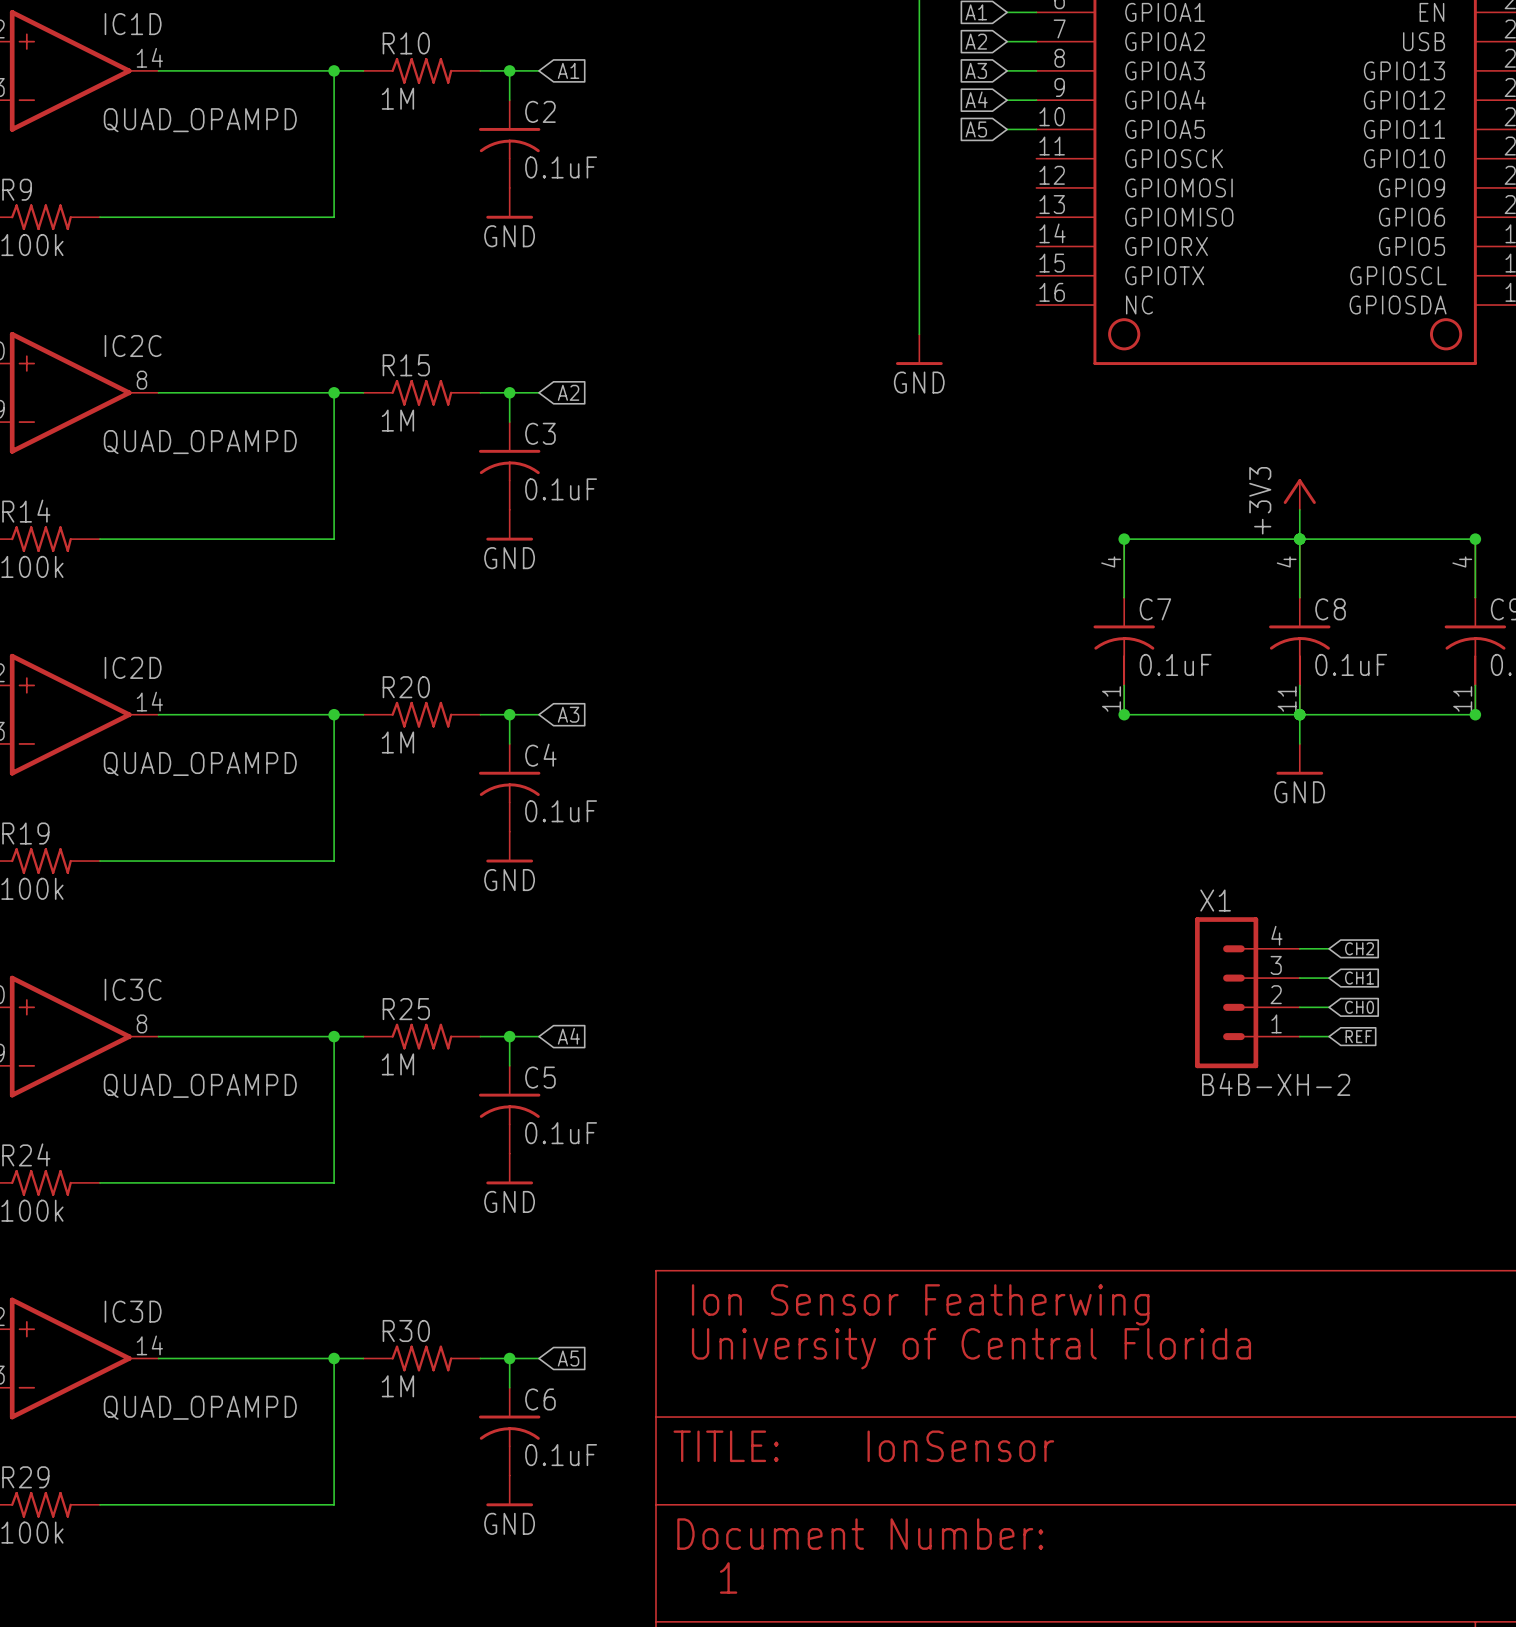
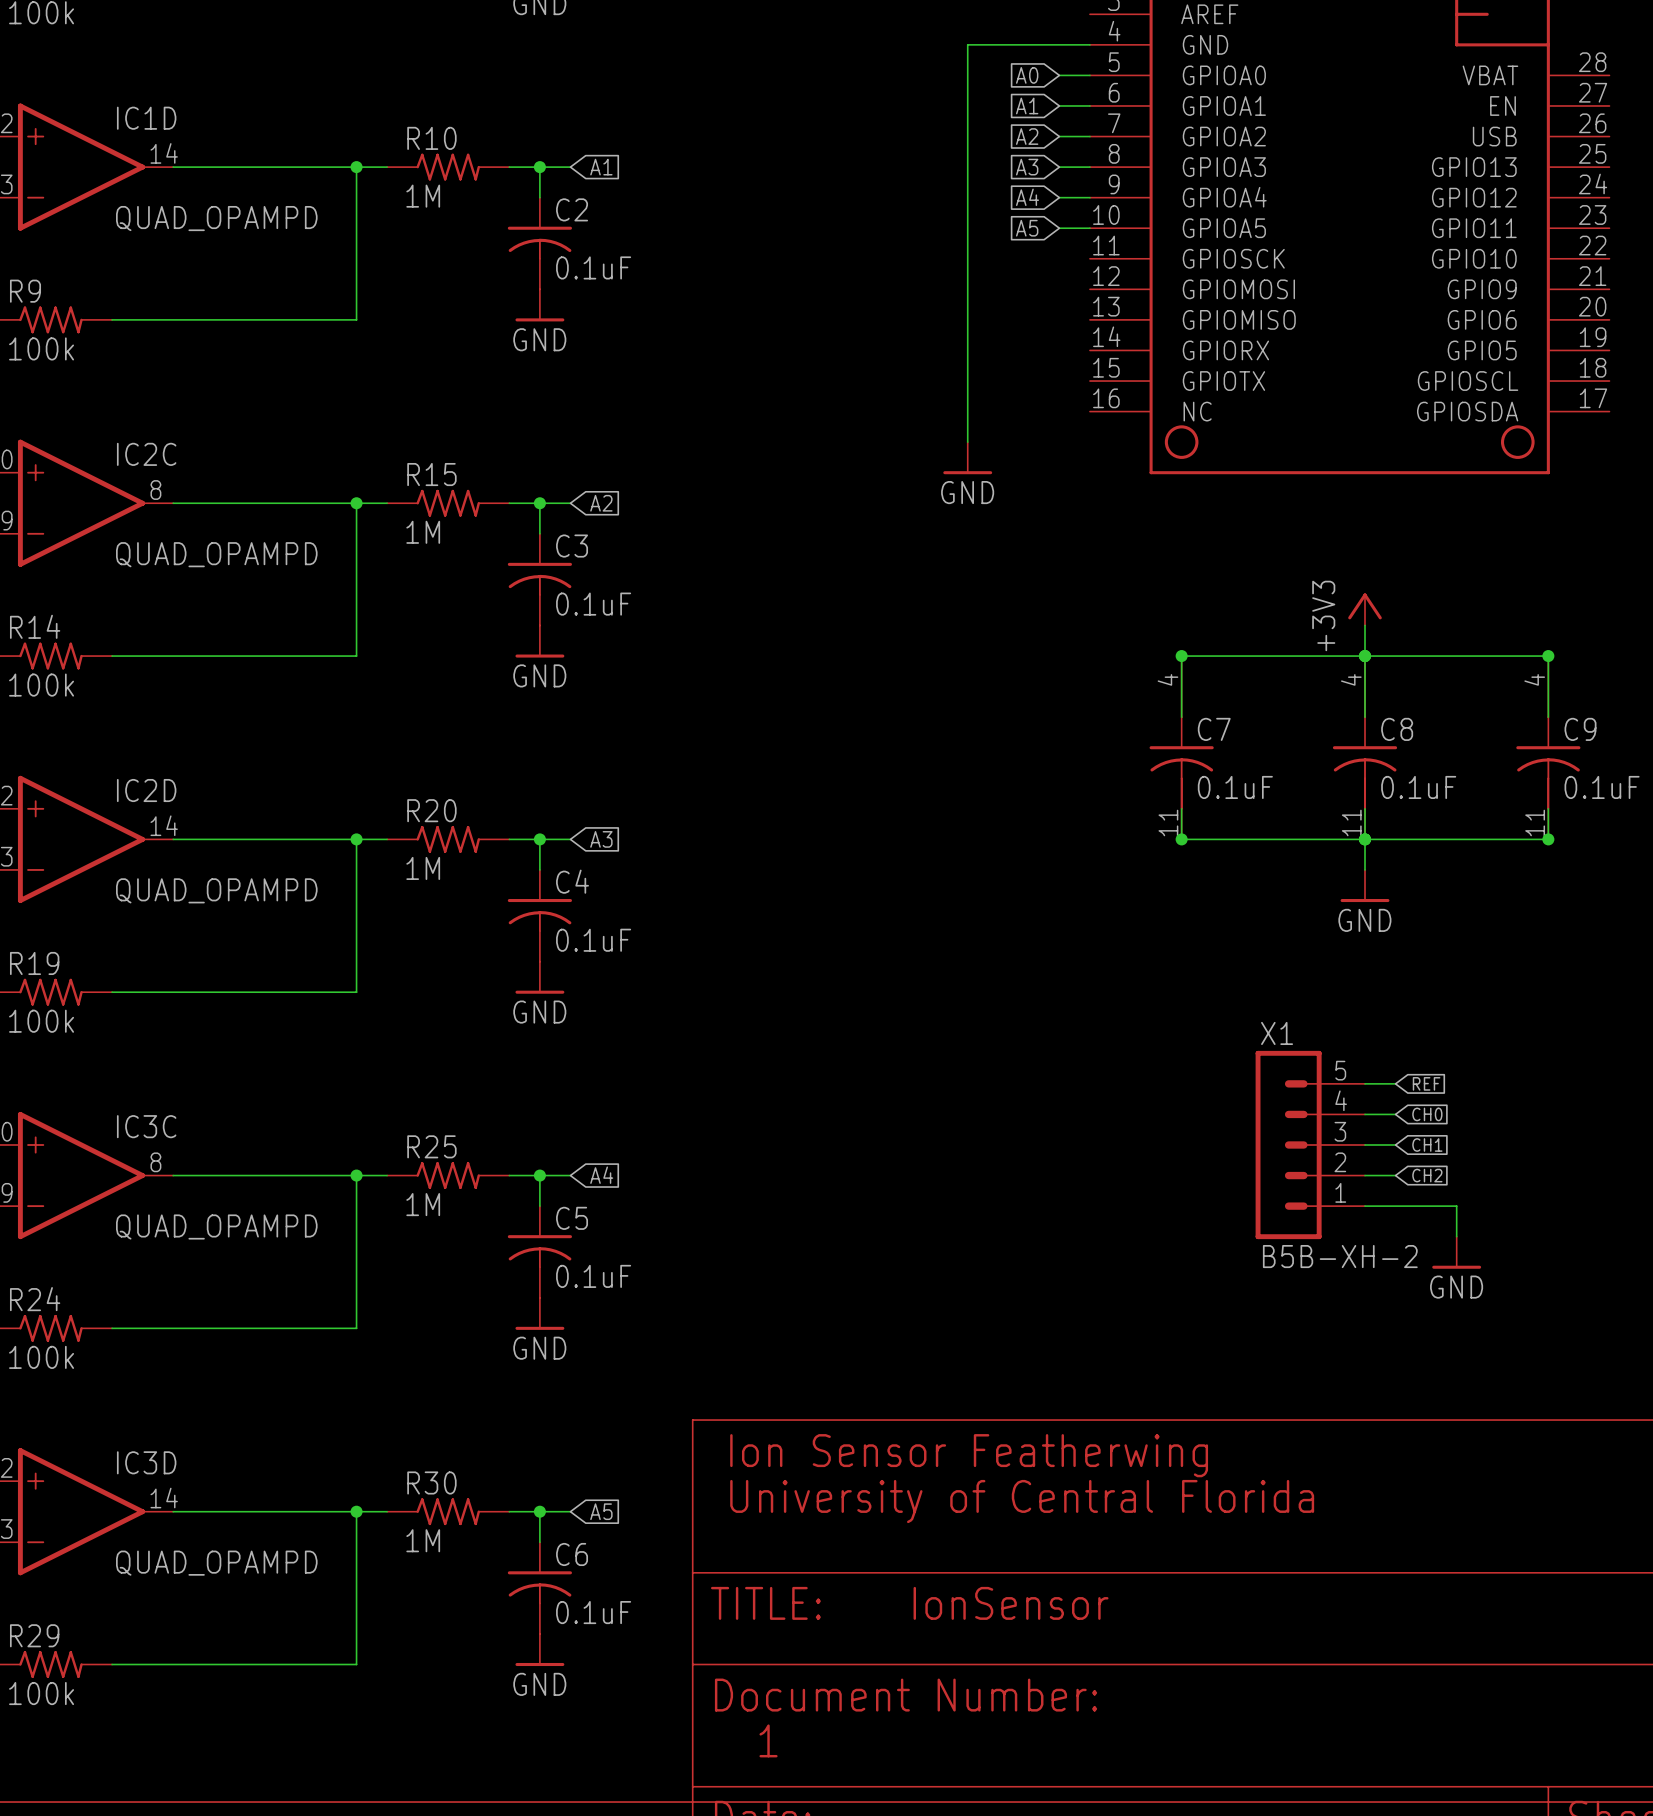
X1 symbol: [1195, 917, 1300, 1069] -> [1255, 1050, 1366, 1240]
global label: CH2 (1359, 948) -> REF (1426, 1083)
global label: CH1 (1359, 978) -> CH0 (1427, 1114)
global label: CH0 (1359, 1007) -> CH1 (1427, 1144)
global label: REF (1358, 1036) -> CH2 (1427, 1175)
wire: none -> (1365, 1206) (1456, 1206) (1456, 1236)
X1 value: B4B-XH-2 (1276, 1084) -> B5B-XH-2 (1340, 1256)
power symbol: none -> GND (1456, 1252)

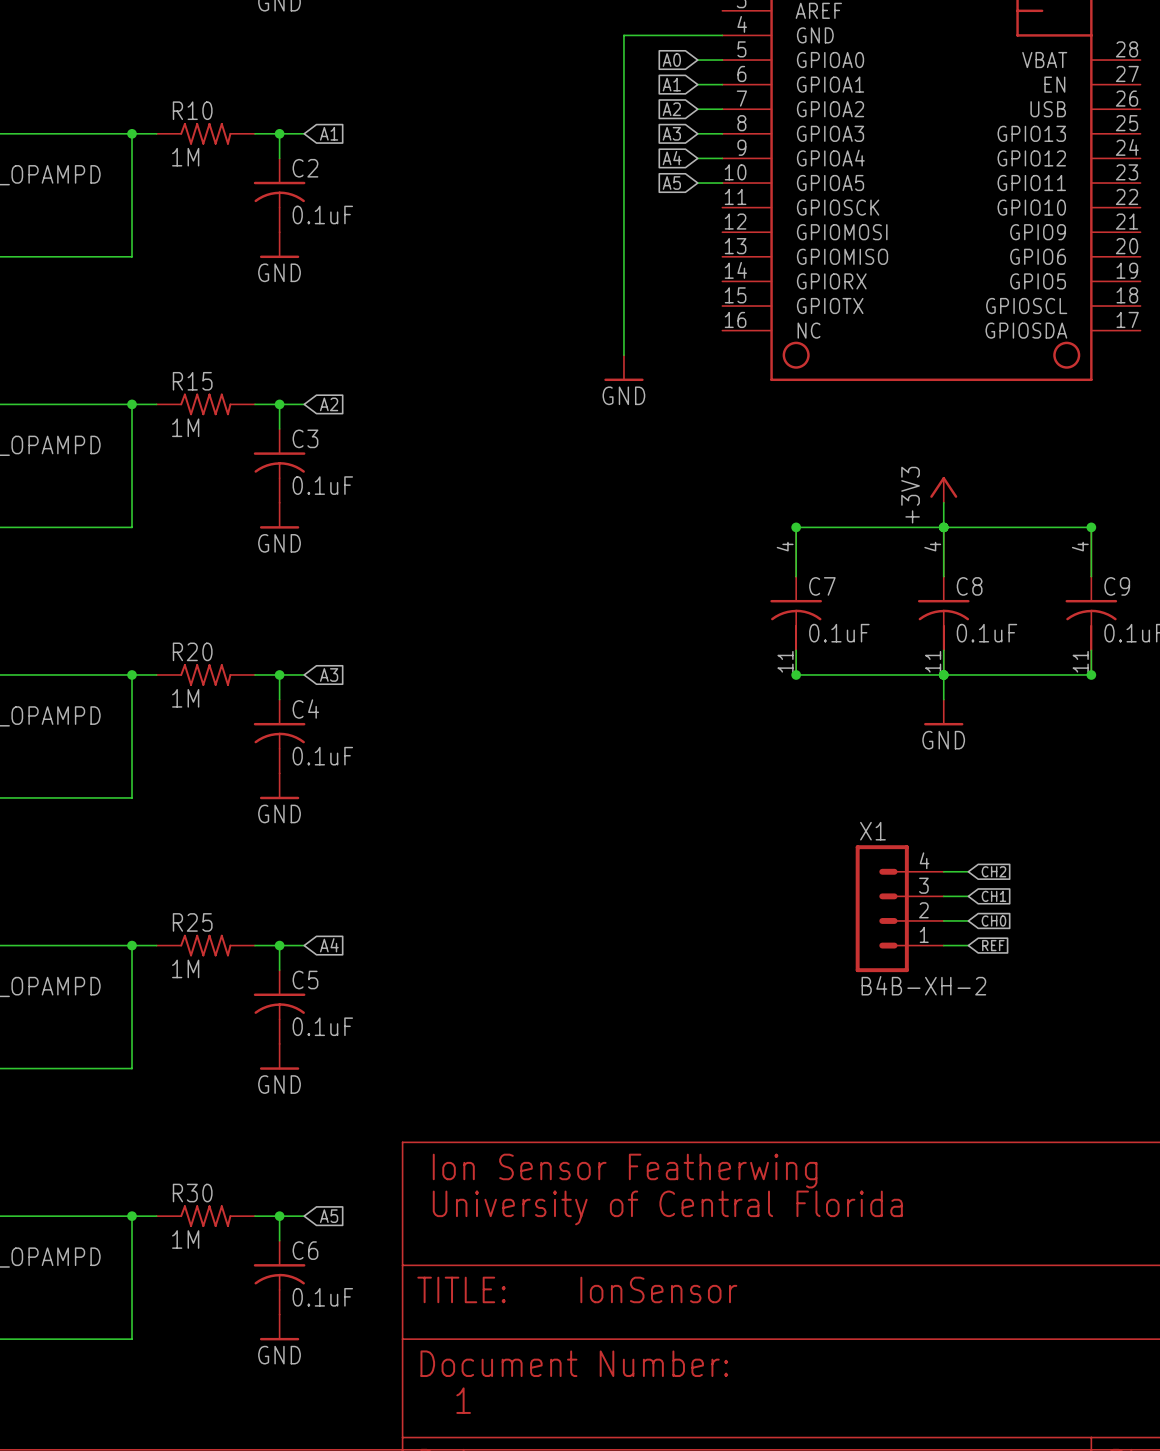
X1 symbol: [1255, 1050, 1366, 1240] -> [855, 845, 944, 973]
global label: REF (1426, 1083) -> CH2 (993, 871)
global label: CH0 (1427, 1114) -> CH1 (993, 896)
global label: CH1 (1427, 1144) -> CH0 (993, 920)
global label: CH2 (1427, 1175) -> REF (993, 945)
wire: (1365, 1206) (1456, 1206) (1456, 1236) -> none
power symbol: GND (1456, 1252) -> none
X1 value: B5B-XH-2 (1340, 1256) -> B4B-XH-2 (923, 985)

